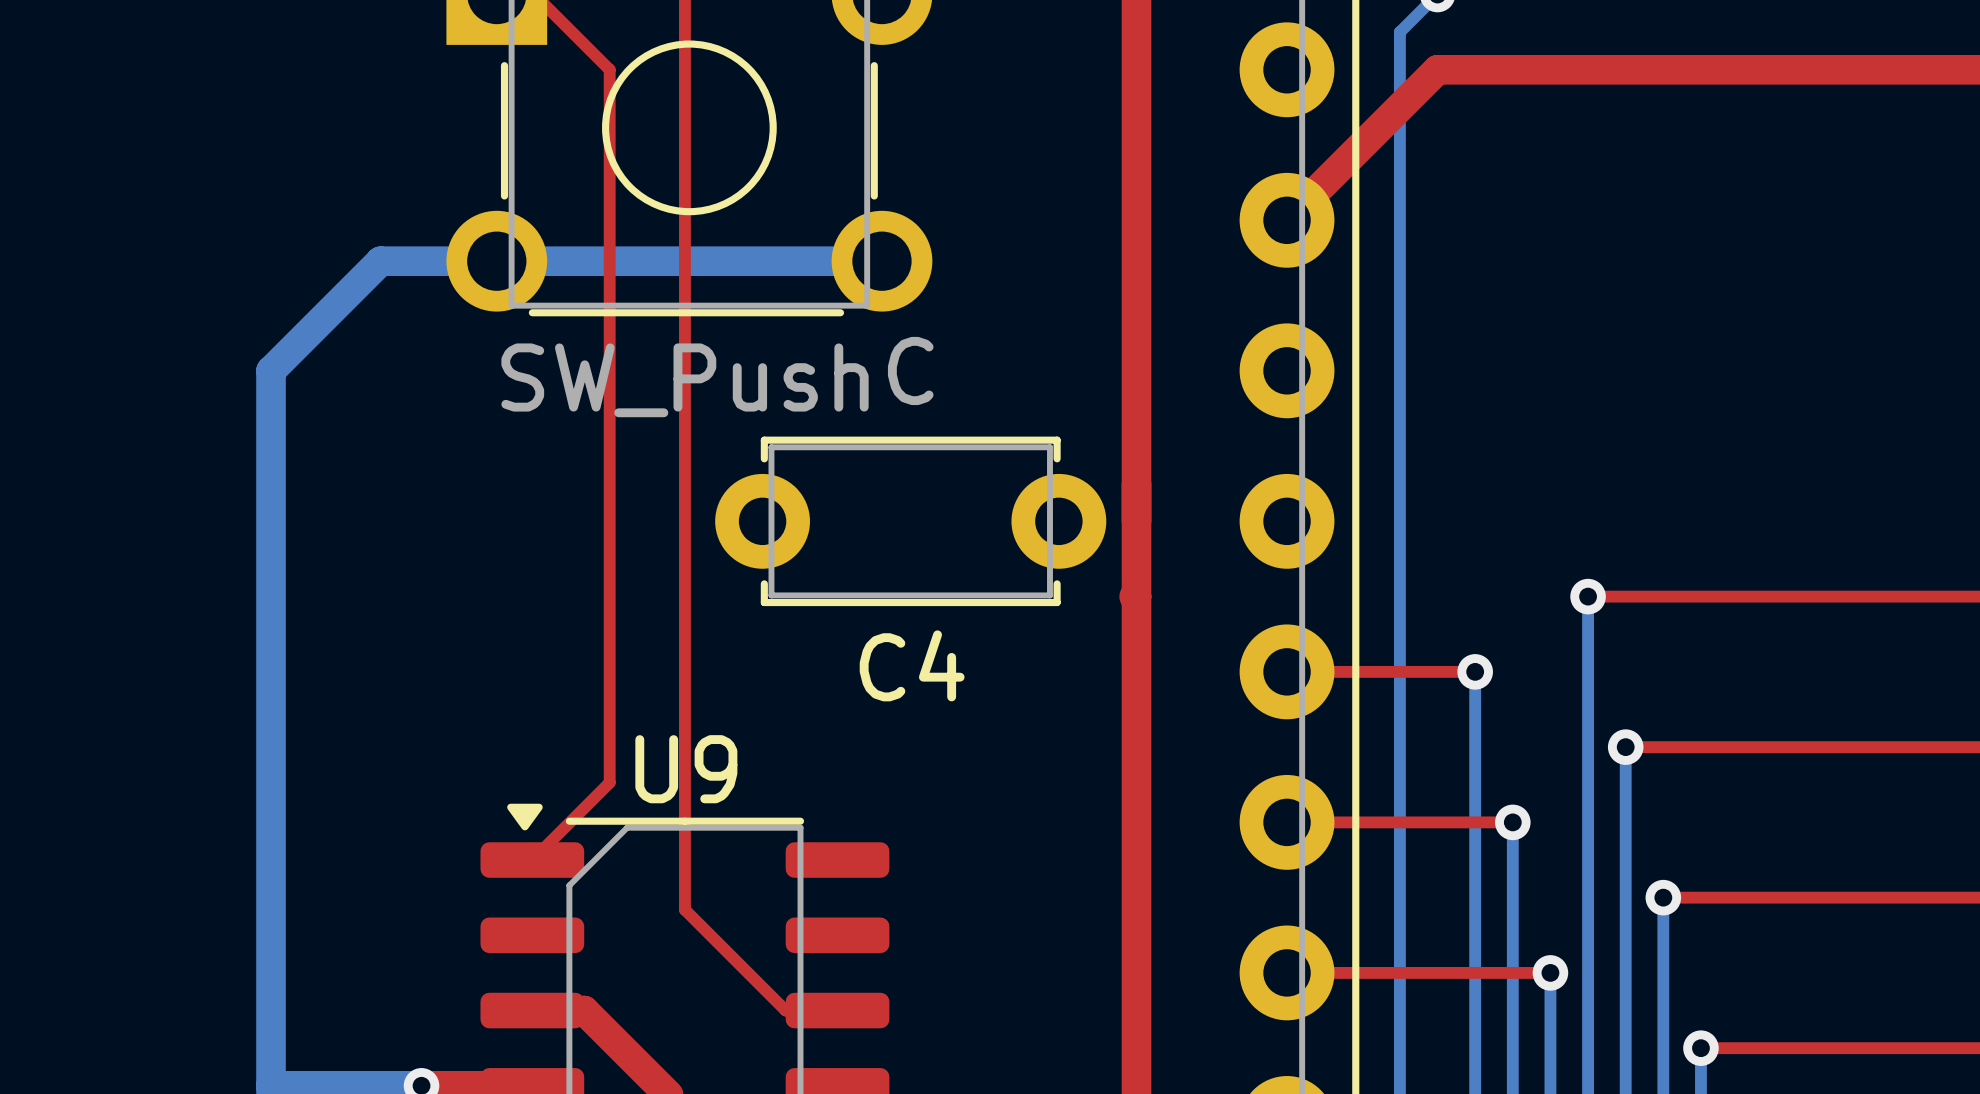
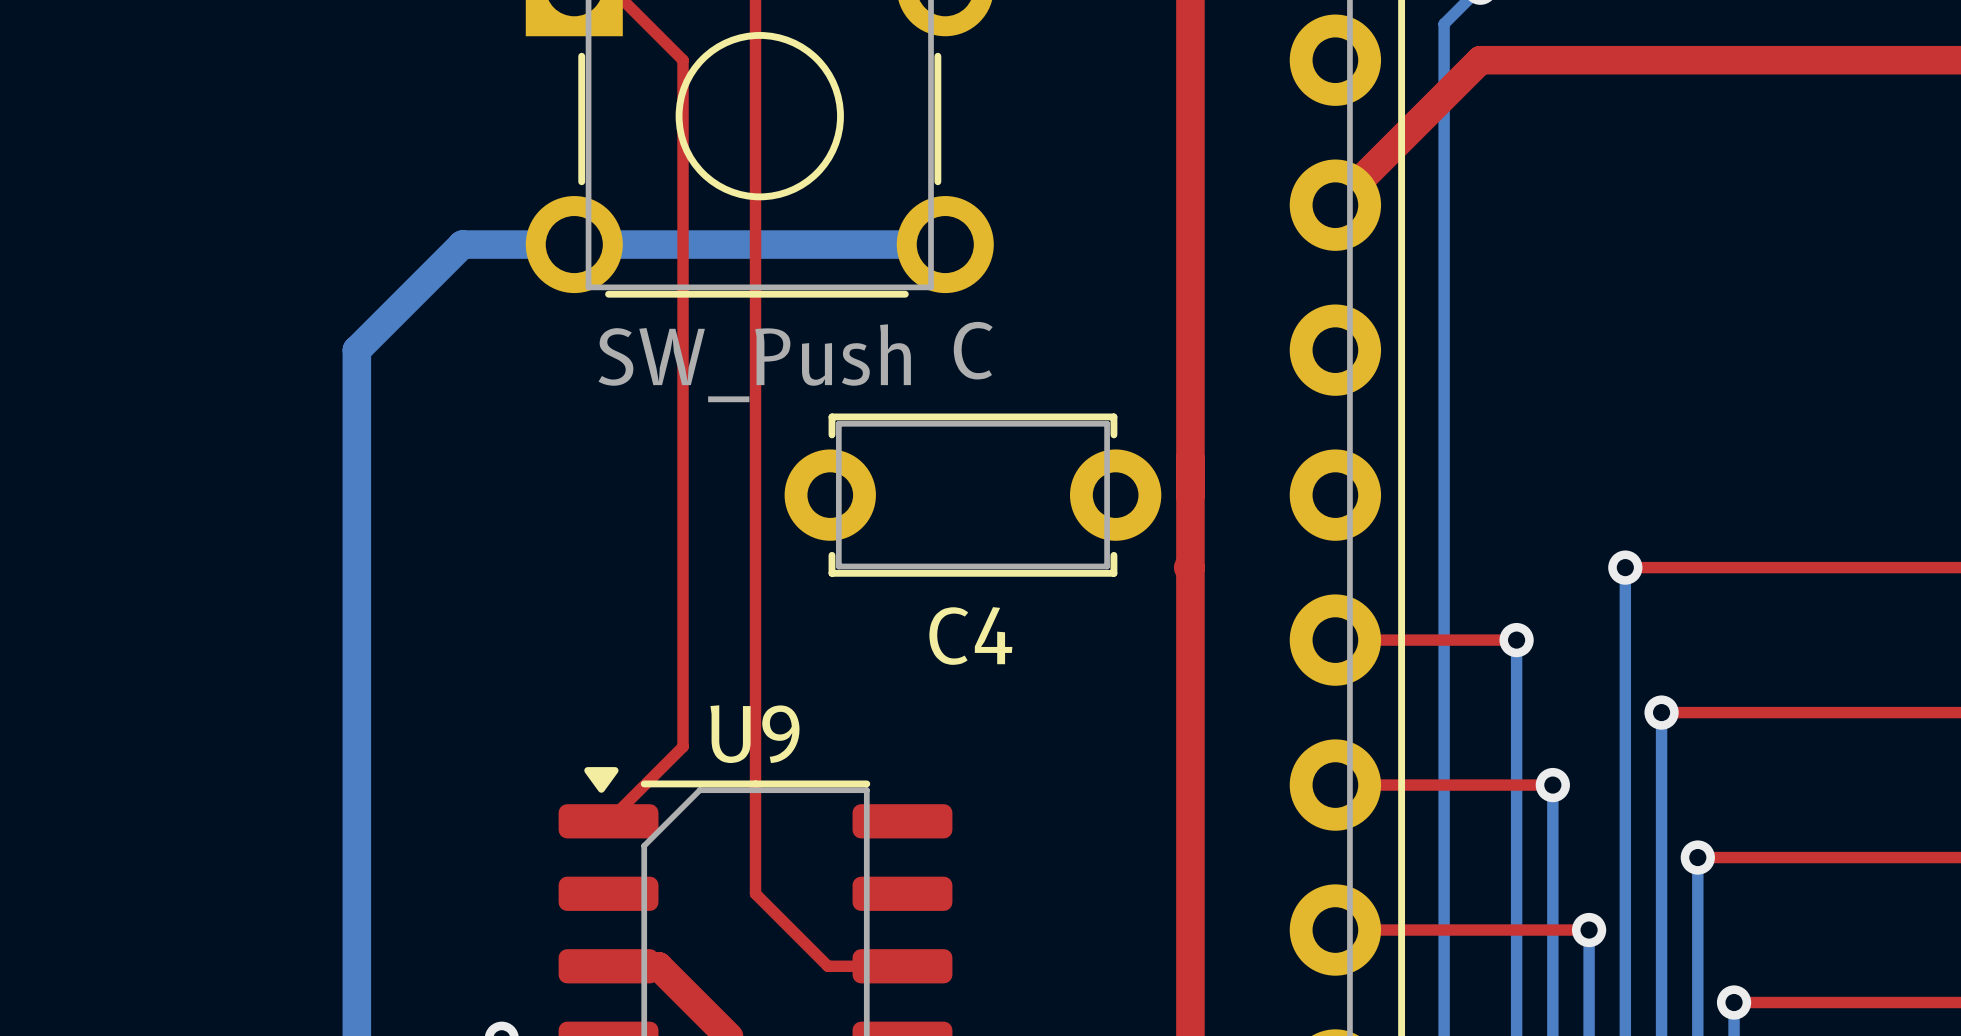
top track: (684, 909) (785, 1010) -> (755, 869) (755, 893) (827, 966) (852, 966)

